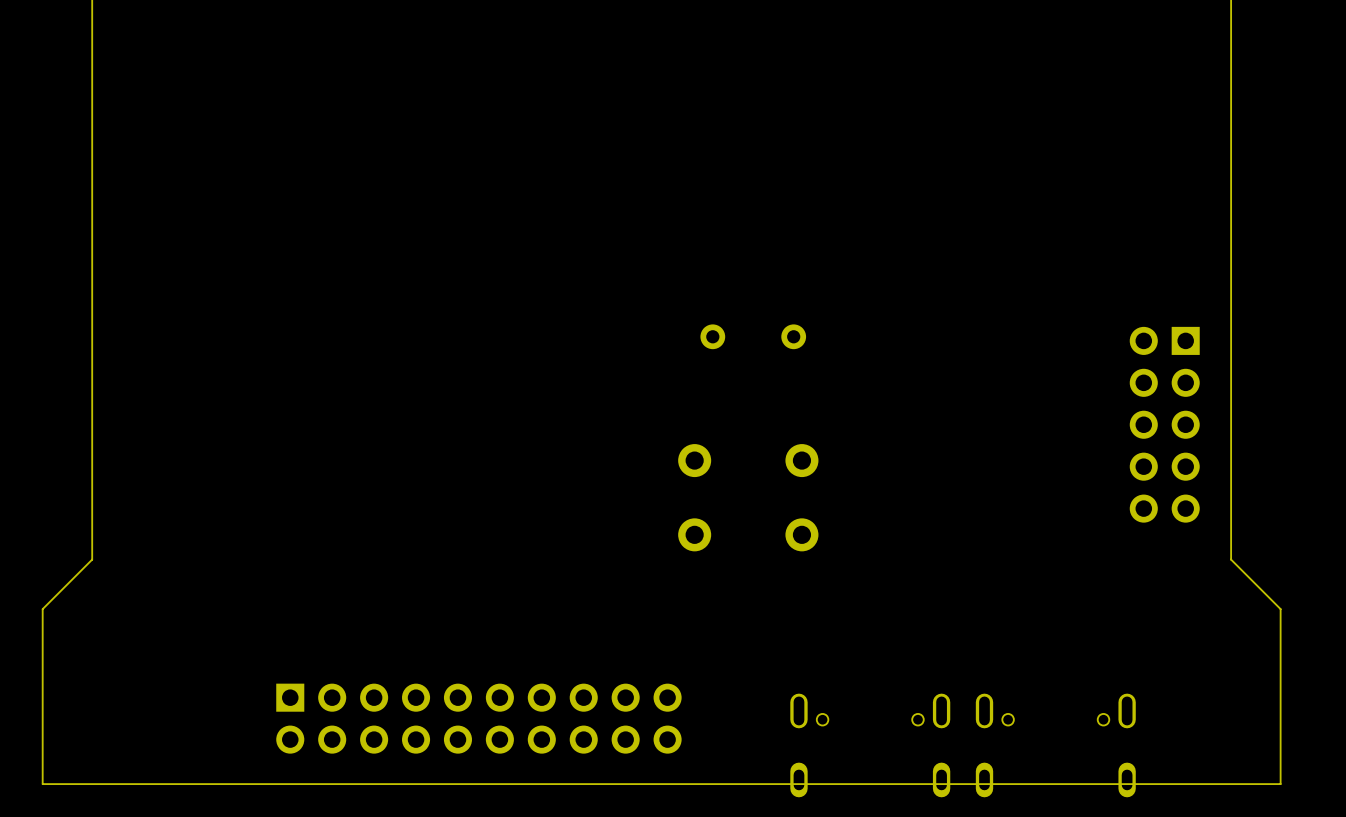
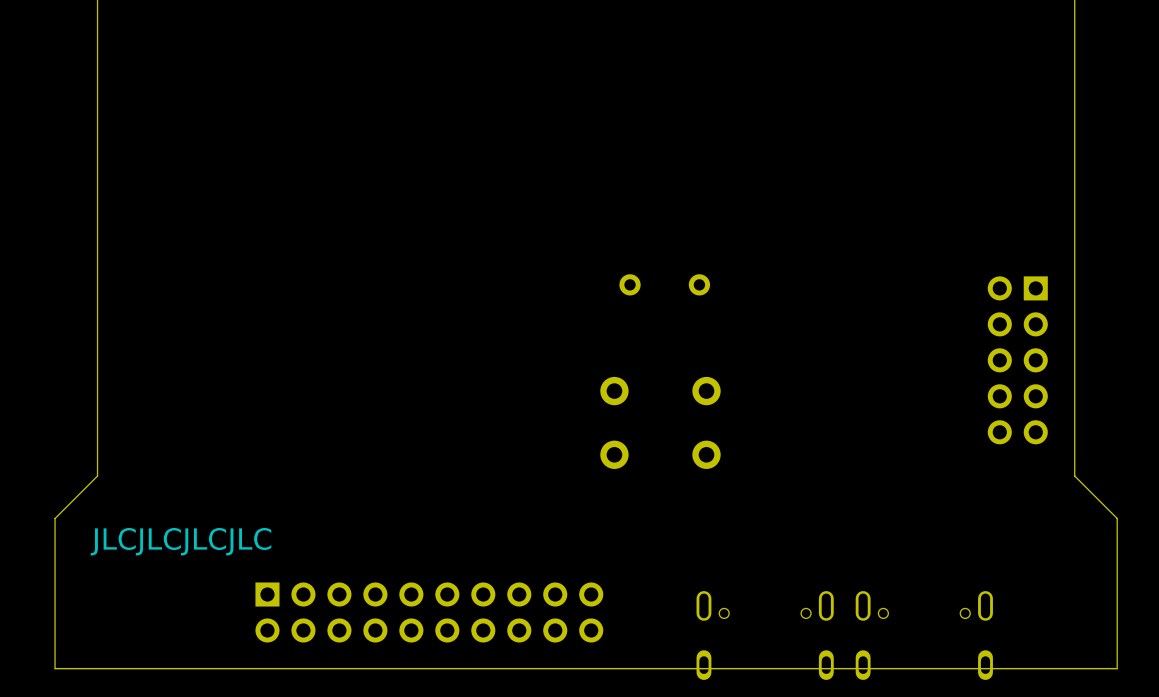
text: none -> JLCJLCJLCJLC (180, 541)

